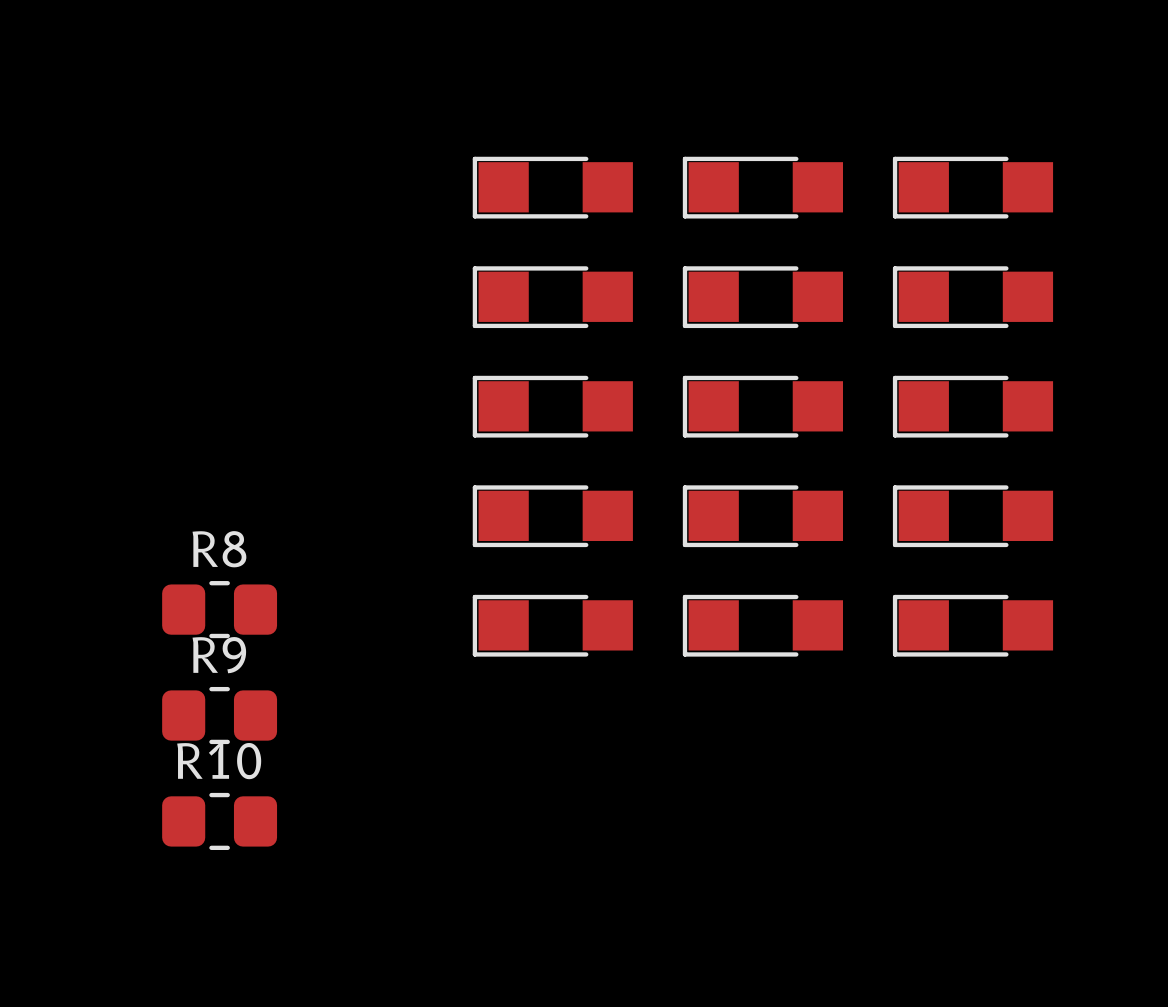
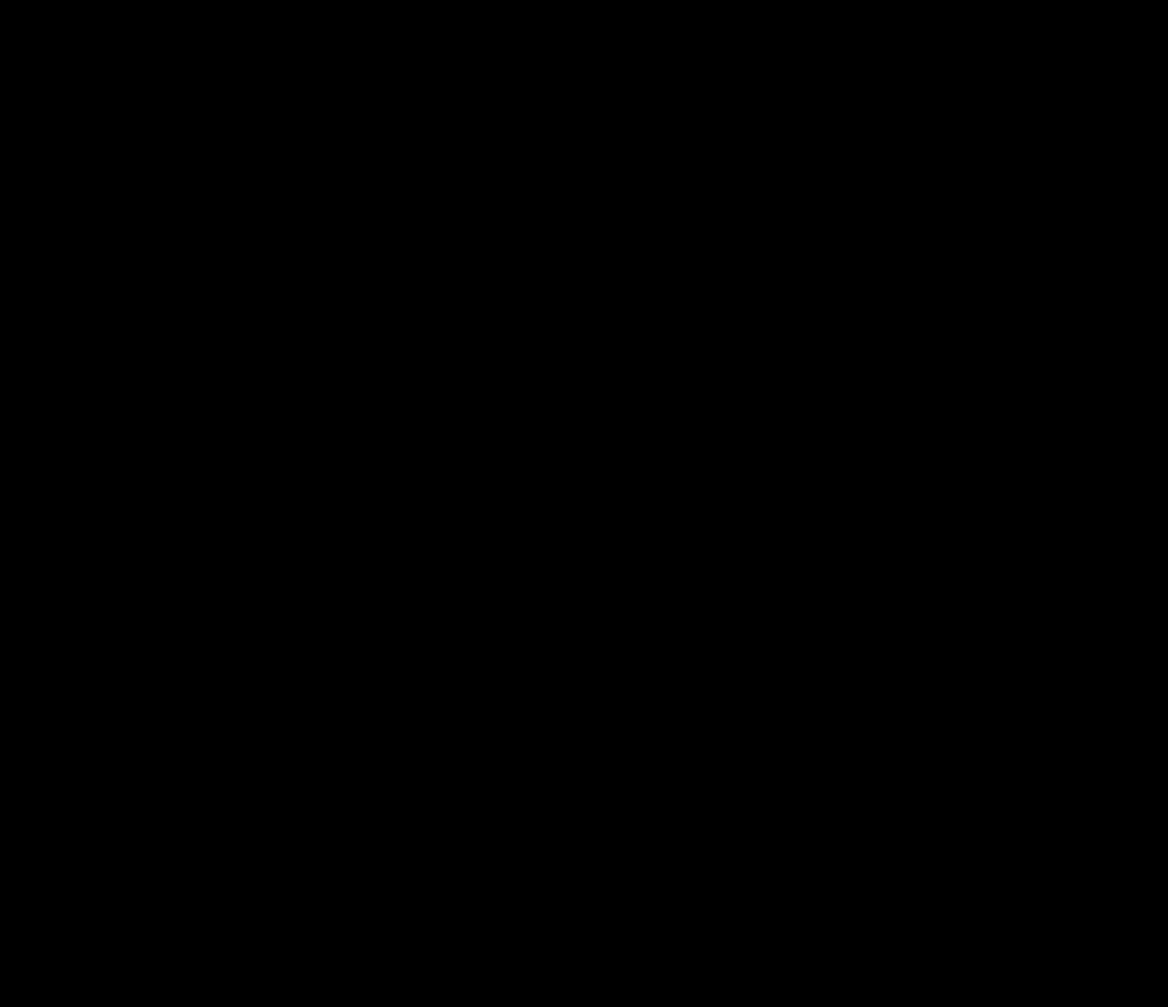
part: (552, 187) -> none
part: (762, 187) -> none
part: (972, 187) -> none
part: (552, 297) -> none
part: (762, 297) -> none
part: (972, 297) -> none
part: (552, 406) -> none
part: (762, 406) -> none
part: (972, 406) -> none
part: (552, 516) -> none
part: (762, 516) -> none
part: (972, 516) -> none
R8: (219, 609) -> none
part: (552, 625) -> none
part: (762, 625) -> none
part: (972, 625) -> none
R9: (219, 715) -> none
R10: (219, 821) -> none

